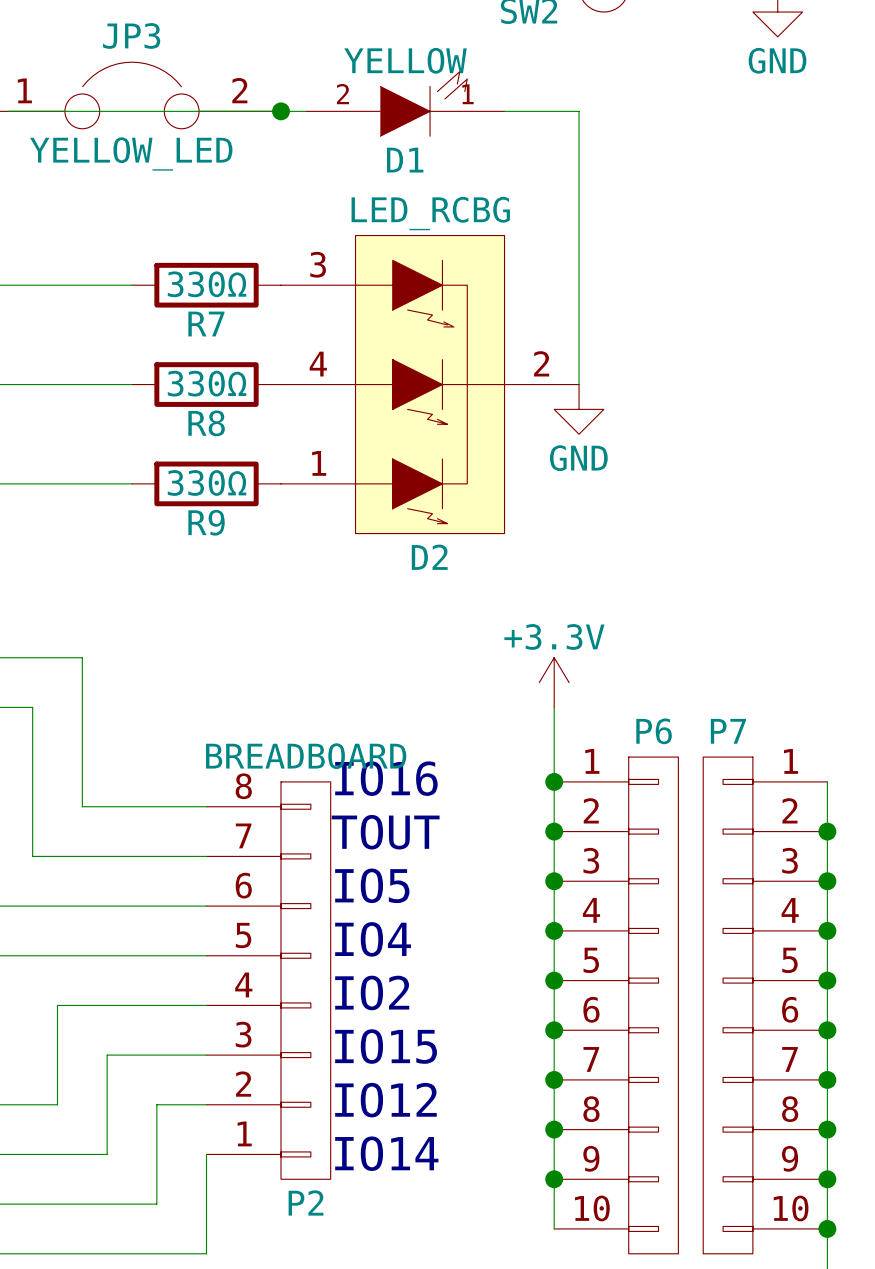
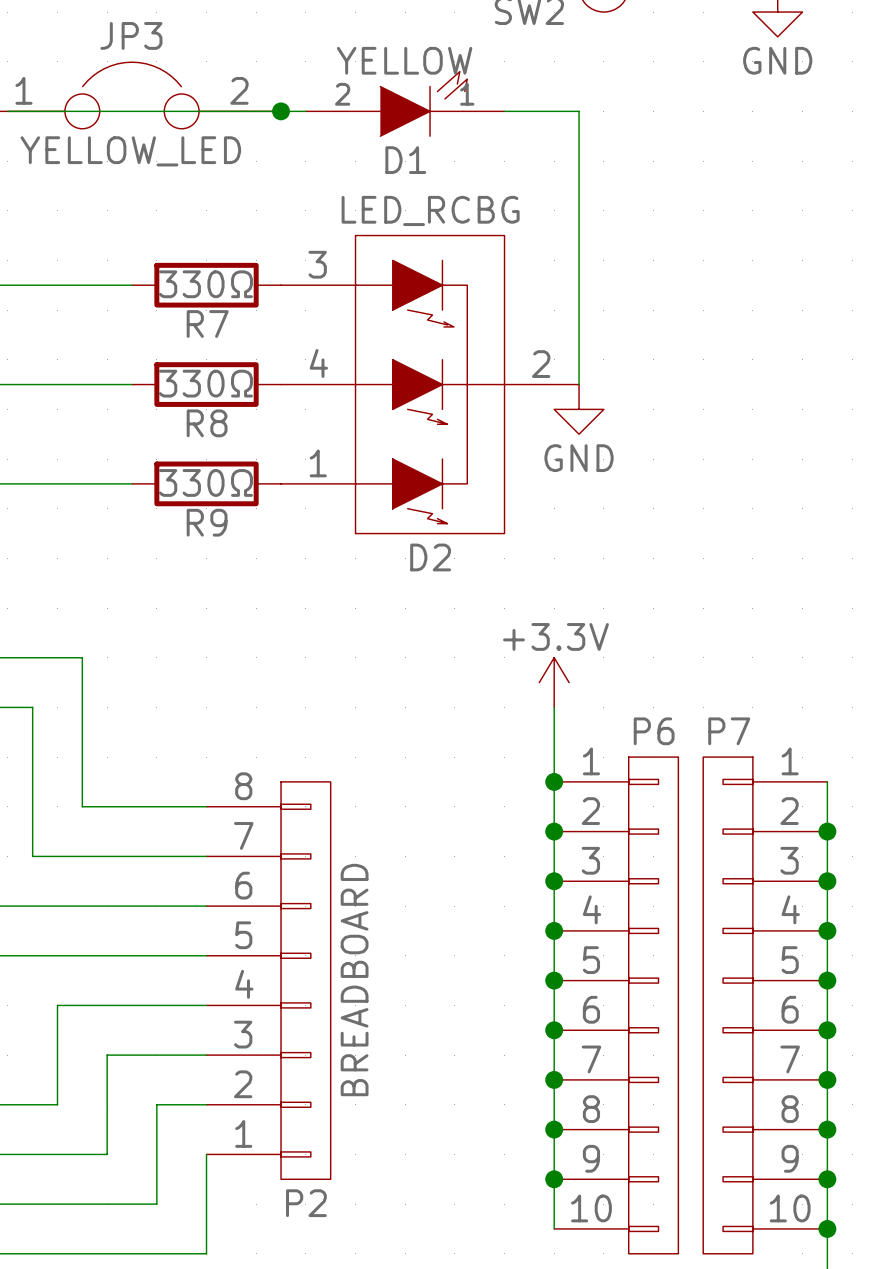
P2 value rotation: 0° (306, 756) -> 90° counterclockwise (354, 980)
text: IO16 (386, 778) -> none
text: TOUT (385, 832) -> none
text: IO5 (372, 885) -> none
text: IO4 (373, 939) -> none
text: IO2 (372, 992) -> none
text: IO15 (386, 1046) -> none
text: IO12 (385, 1100) -> none
text: IO14 (386, 1153) -> none

